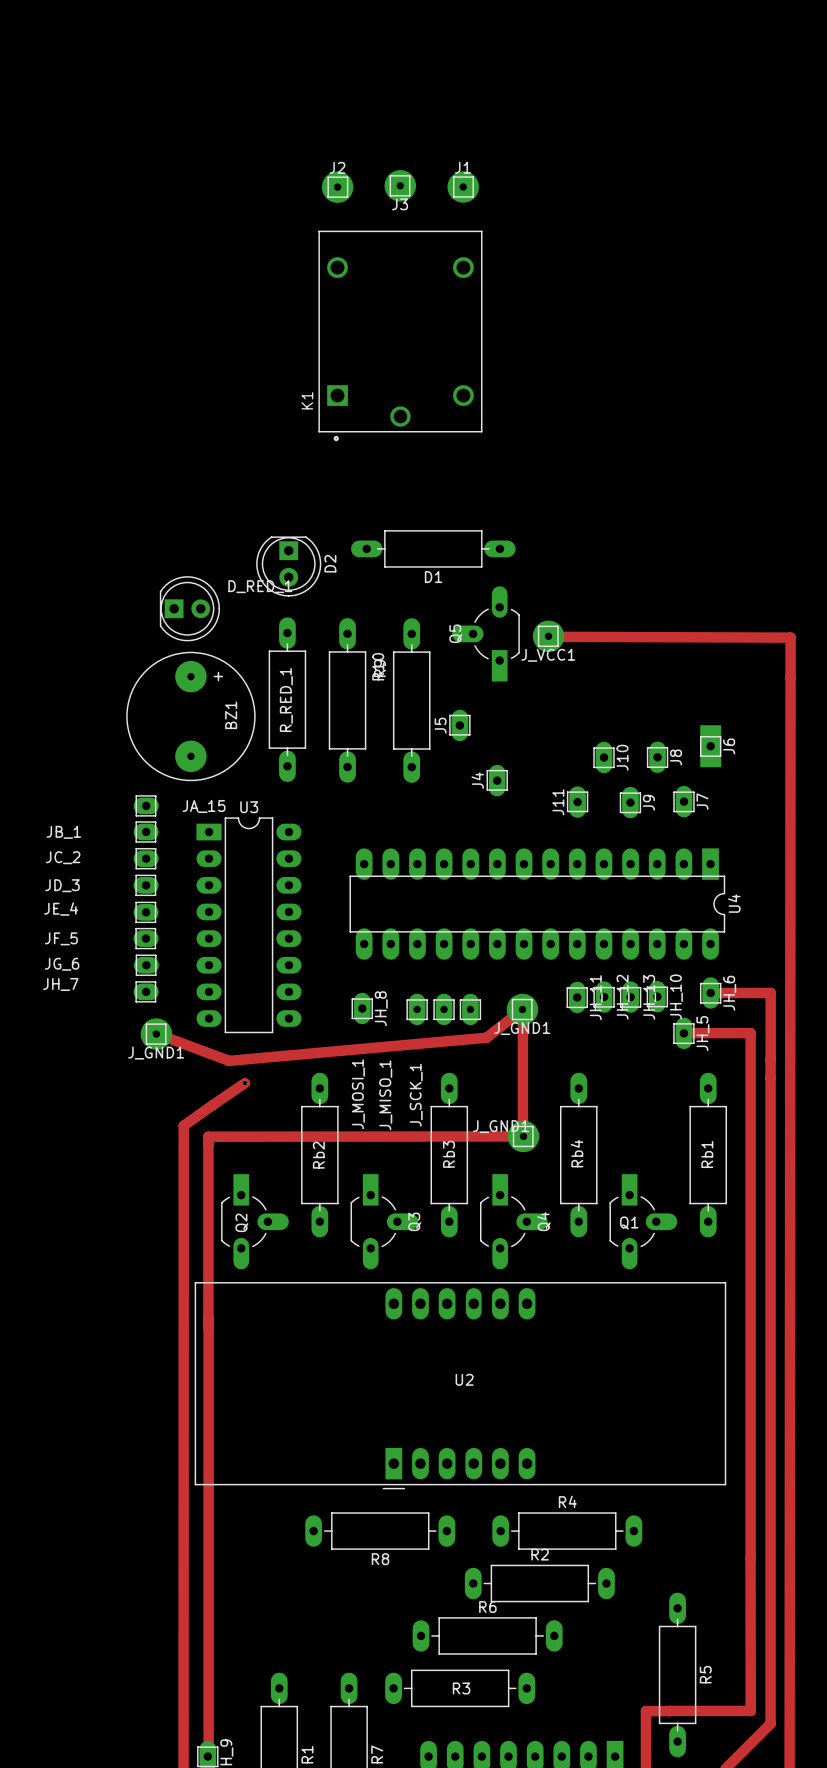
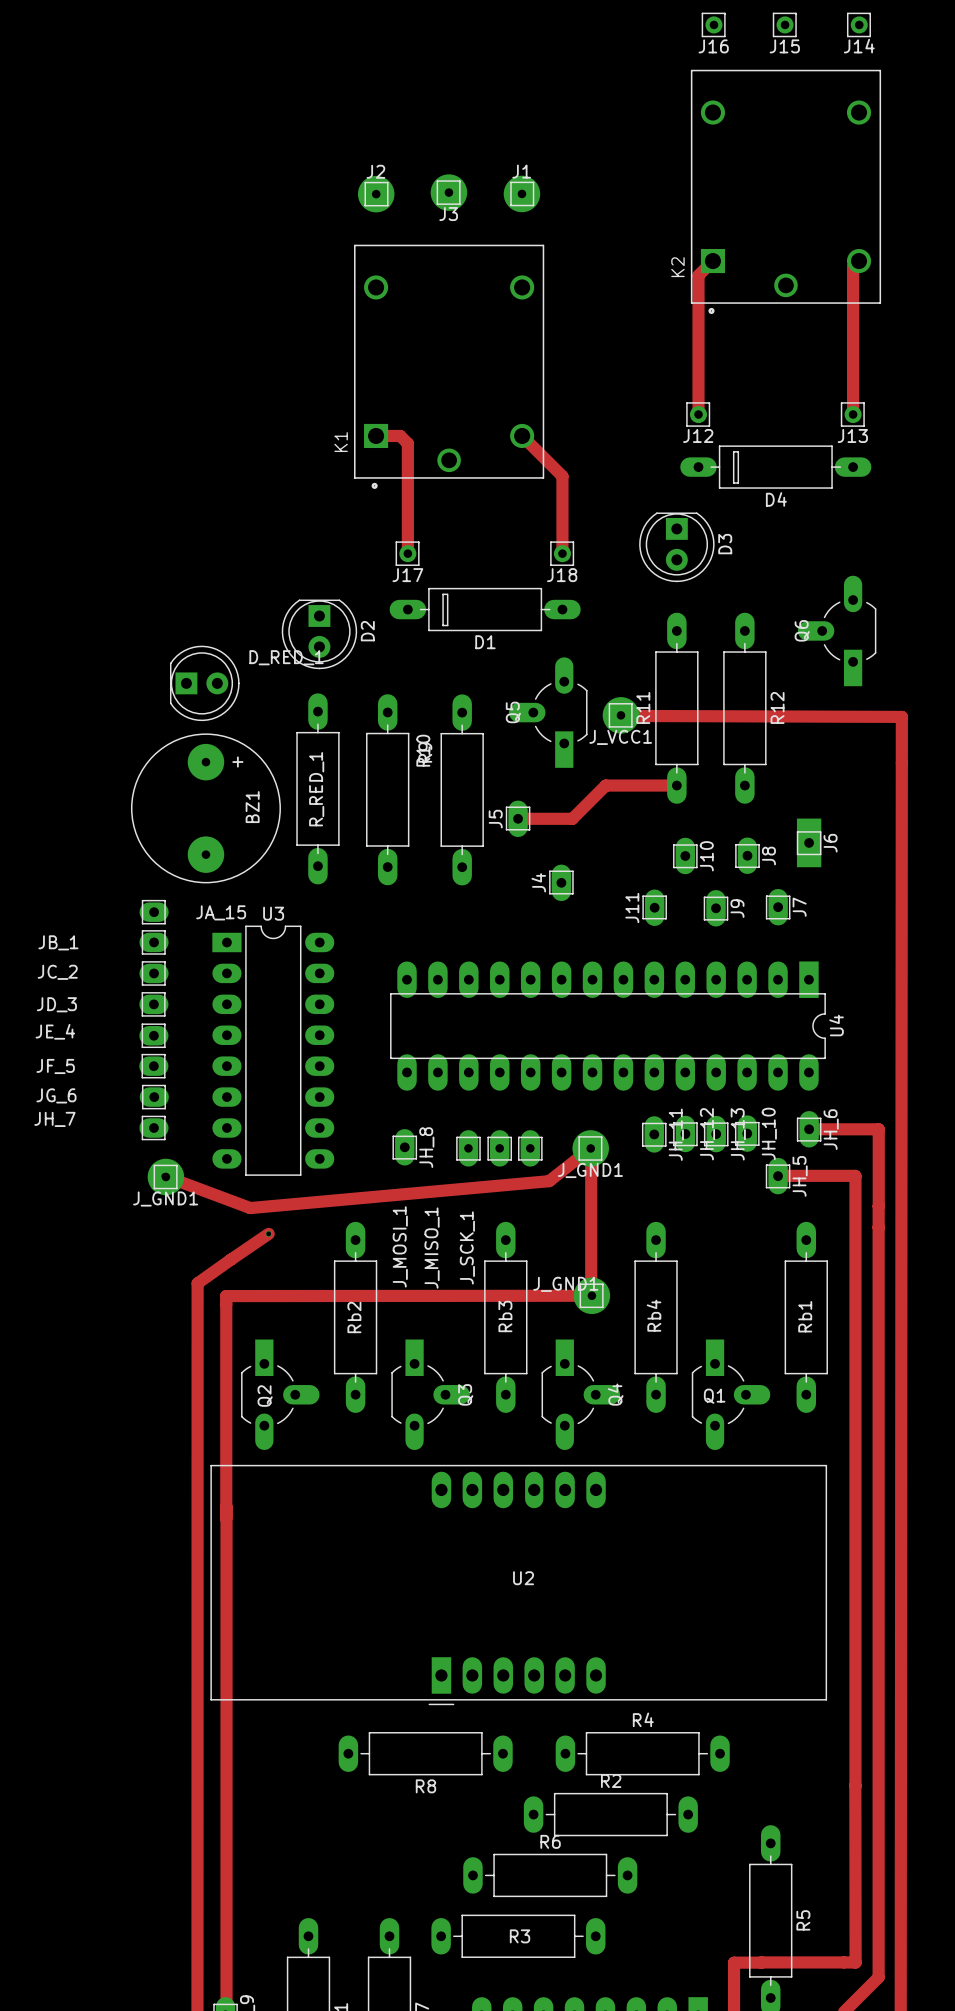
J16: none -> (713, 24)
J15: none -> (784, 24)
J14: none -> (858, 24)
K2: none -> (785, 191)
track: none -> (712, 261) (698, 275) (698, 414)
track: none -> (859, 261) (853, 266) (853, 414)
J12: none -> (698, 414)
J13: none -> (852, 414)
track: none -> (376, 435) (400, 435) (407, 443) (407, 553)
track: none -> (522, 435) (562, 476) (562, 553)
D4: none -> (775, 467)
D3: none -> (676, 547)
J17: none -> (407, 553)
J18: none -> (562, 553)
D1 footprint: [350, 530, 516, 568] -> [389, 587, 581, 632]
Q6: none -> (837, 630)
R11: none -> (676, 708)
R12: none -> (744, 708)
track: none -> (676, 785) (605, 785) (572, 818) (518, 818)

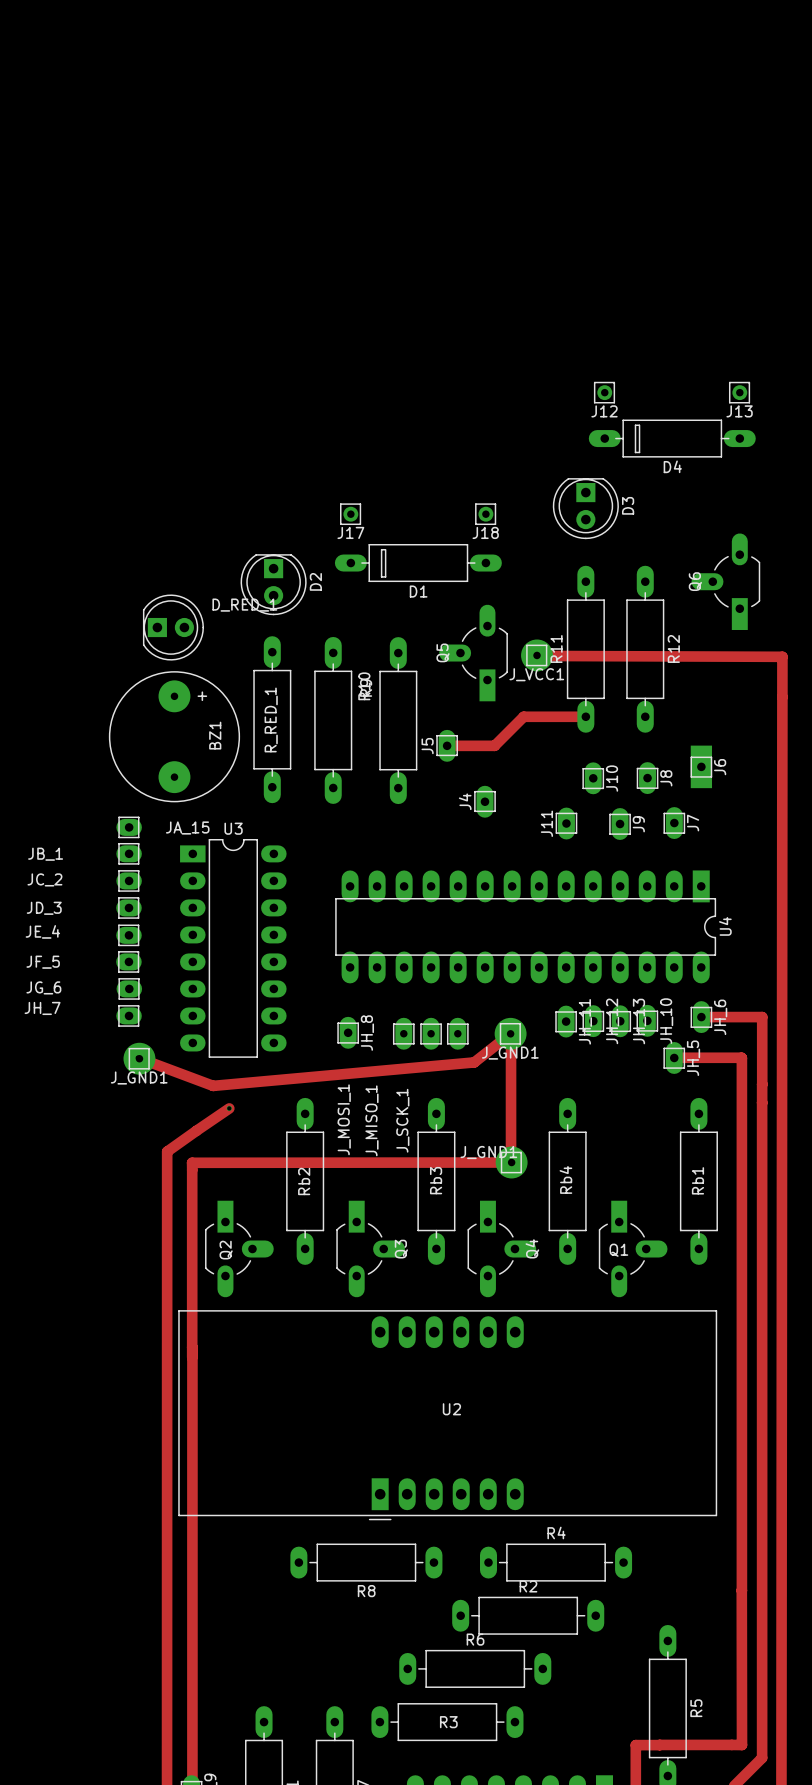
J16: (713, 24) -> none
J15: (784, 24) -> none
J14: (858, 24) -> none
K2: (785, 191) -> none
J3: (448, 192) -> none
J1: (521, 193) -> none
J2: (376, 194) -> none
track: (712, 261) (698, 275) (698, 414) -> none
track: (859, 261) (853, 266) (853, 414) -> none
K1: (449, 366) -> none
track: (376, 435) (400, 435) (407, 443) (407, 553) -> none
track: (522, 435) (562, 476) (562, 553) -> none

